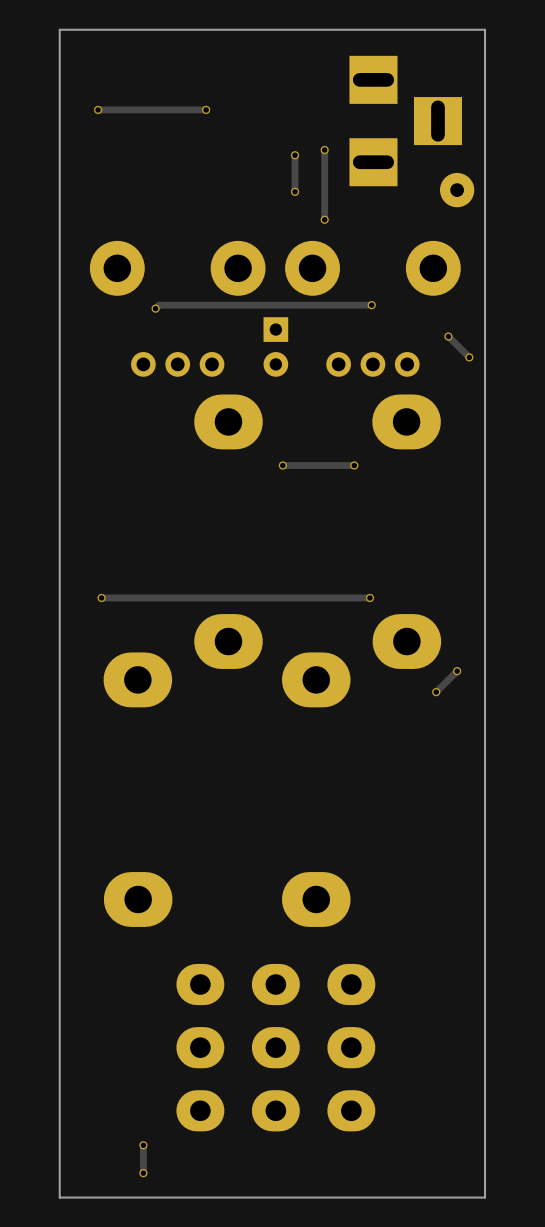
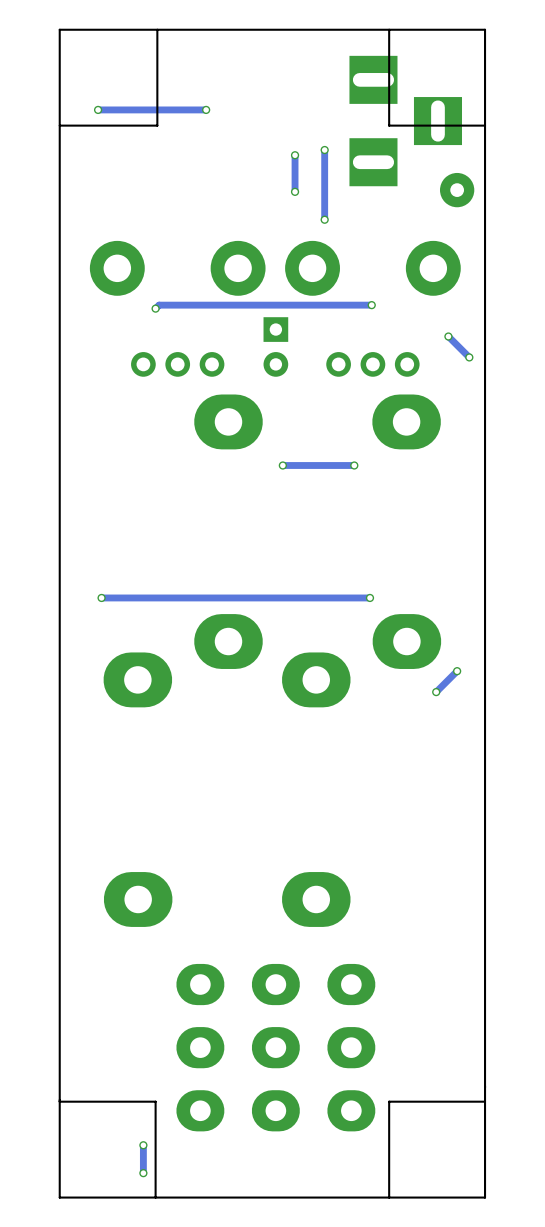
board edge: none -> (157, 29) (157, 125) (59, 125)
board edge: none -> (389, 29) (389, 125) (485, 125)
board edge: none -> (59, 1101) (155, 1101) (155, 1197)
board edge: none -> (485, 1101) (389, 1101) (389, 1197)

